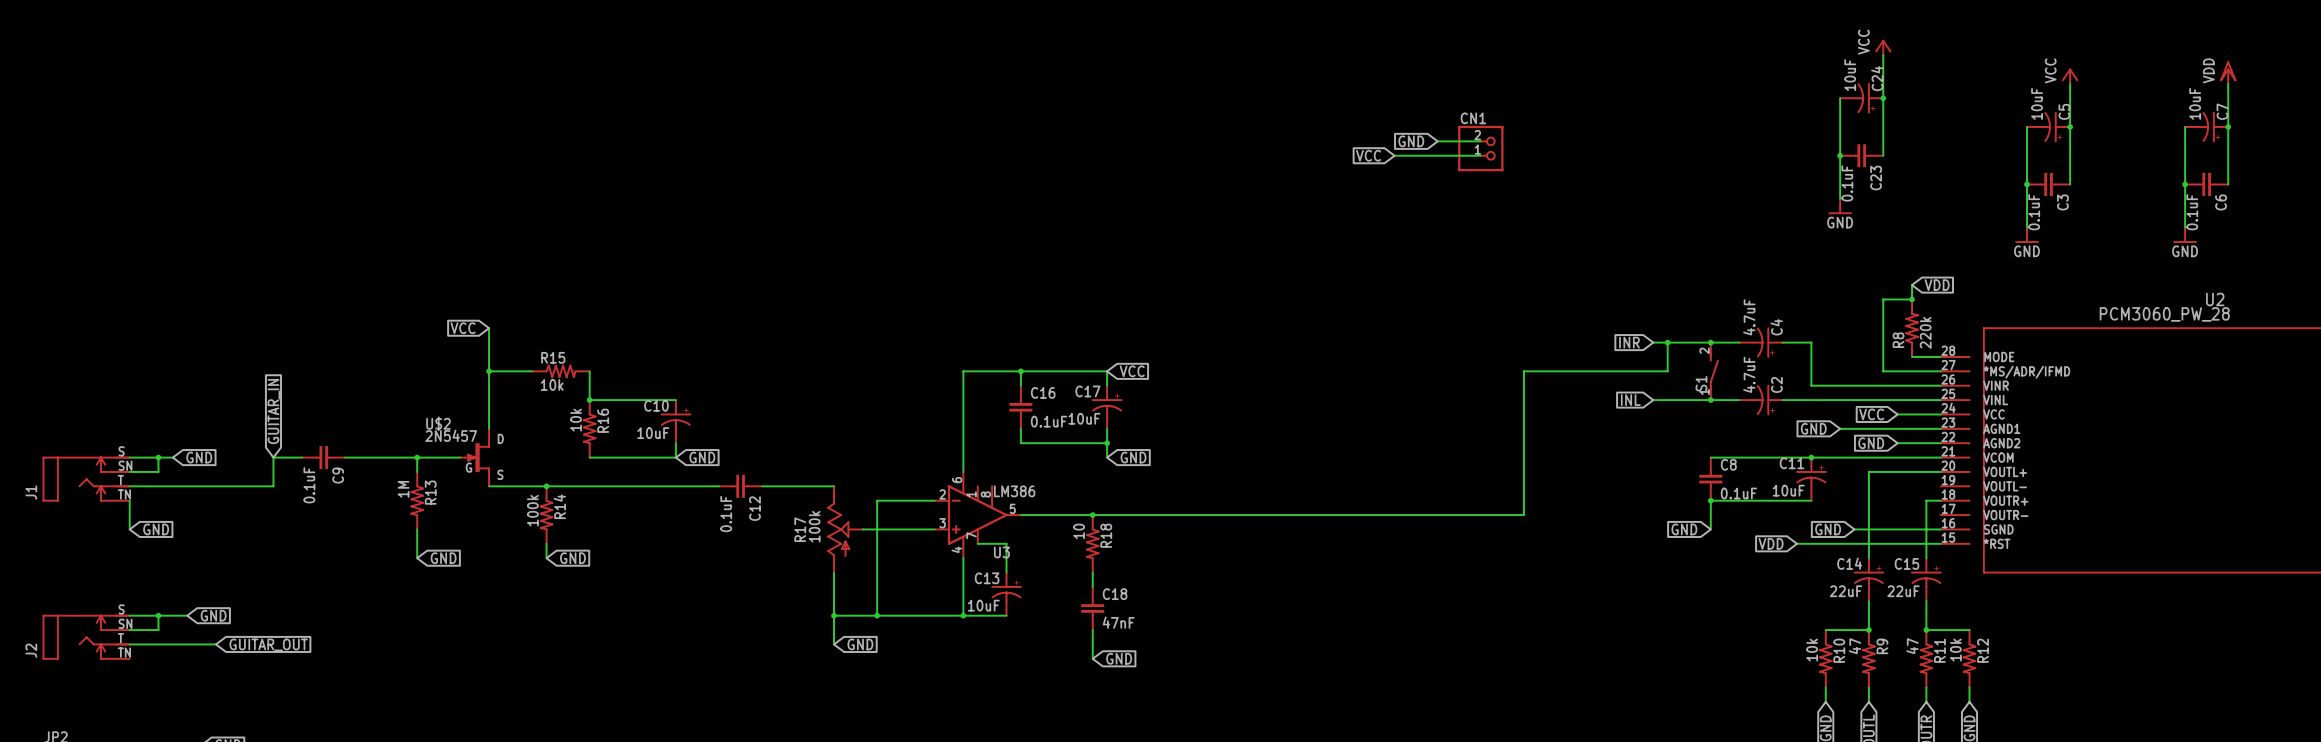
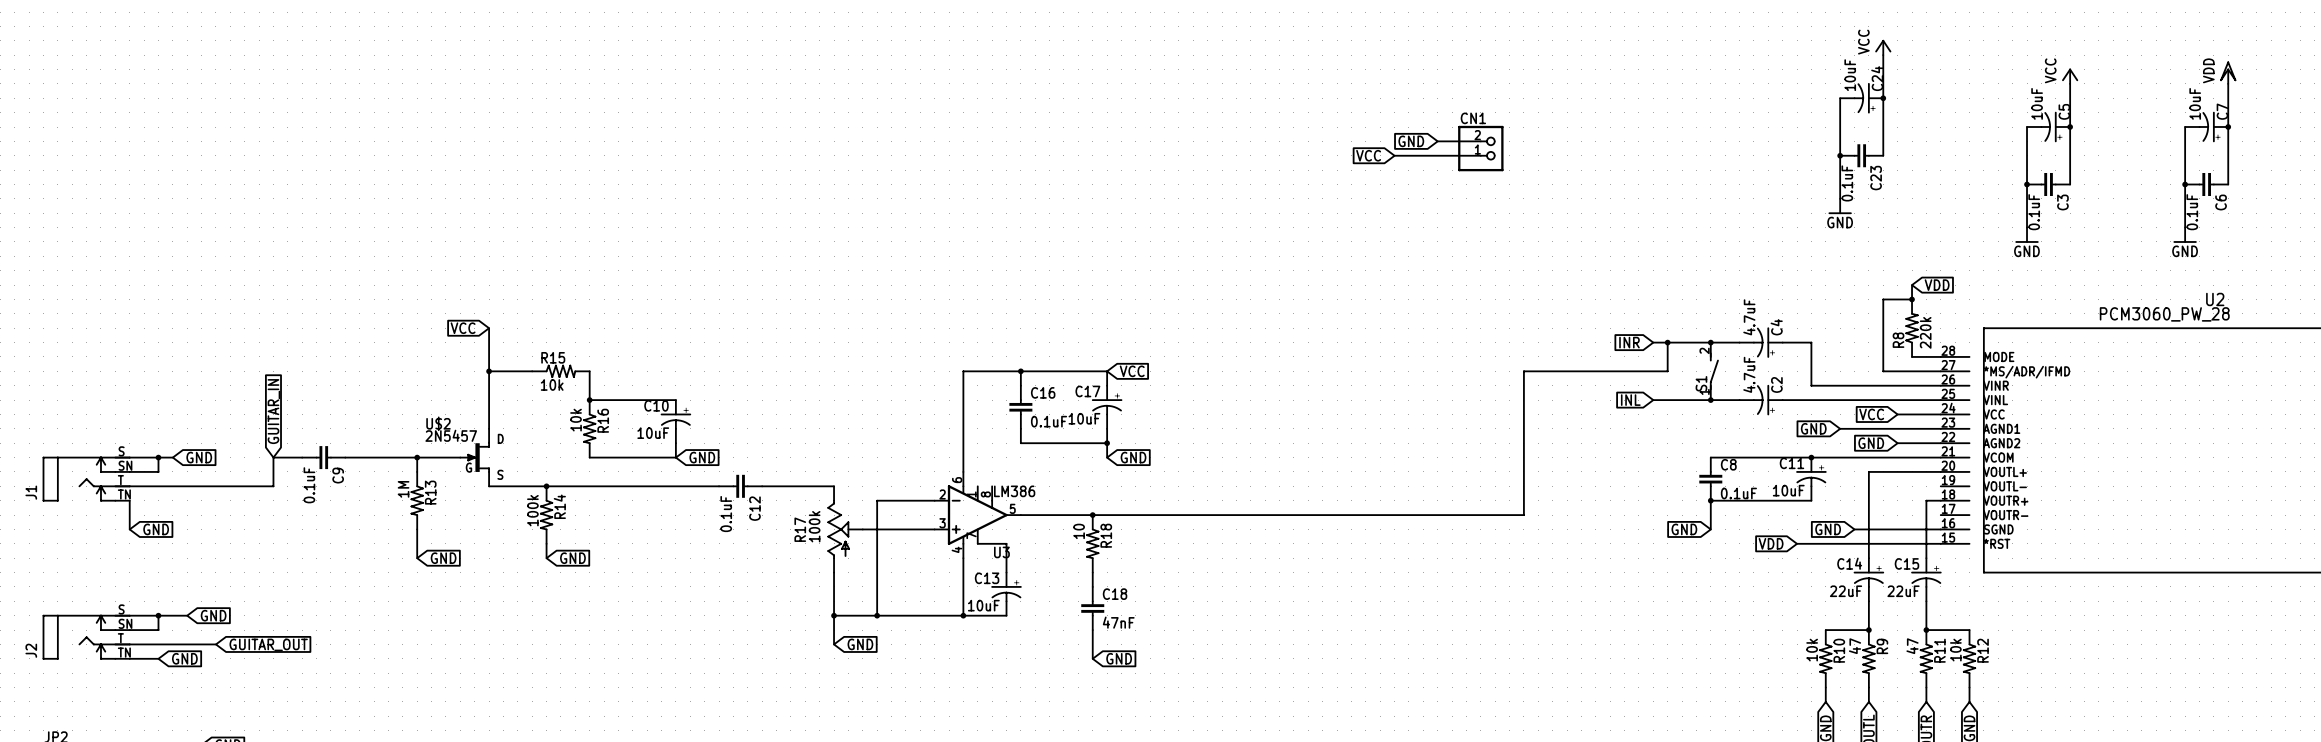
wire: none -> (129, 658) (158, 658)
global label: none -> GND (184, 658)

